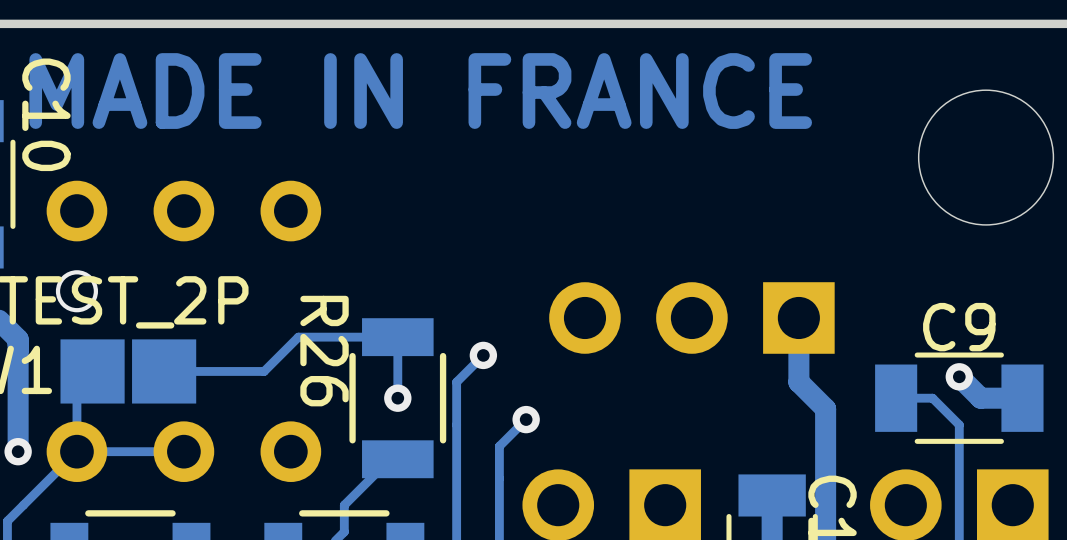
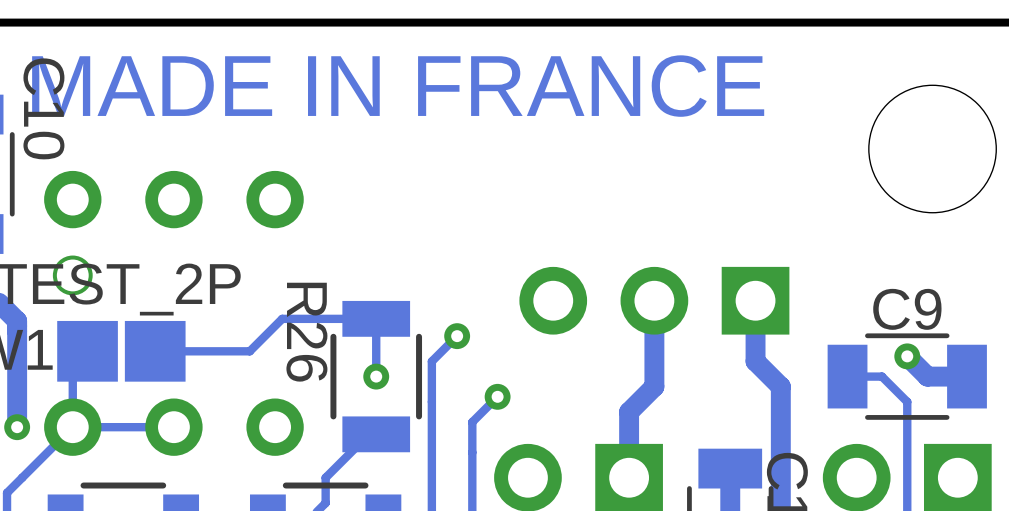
track: none -> (654, 300) (654, 386) (629, 412) (629, 477)

